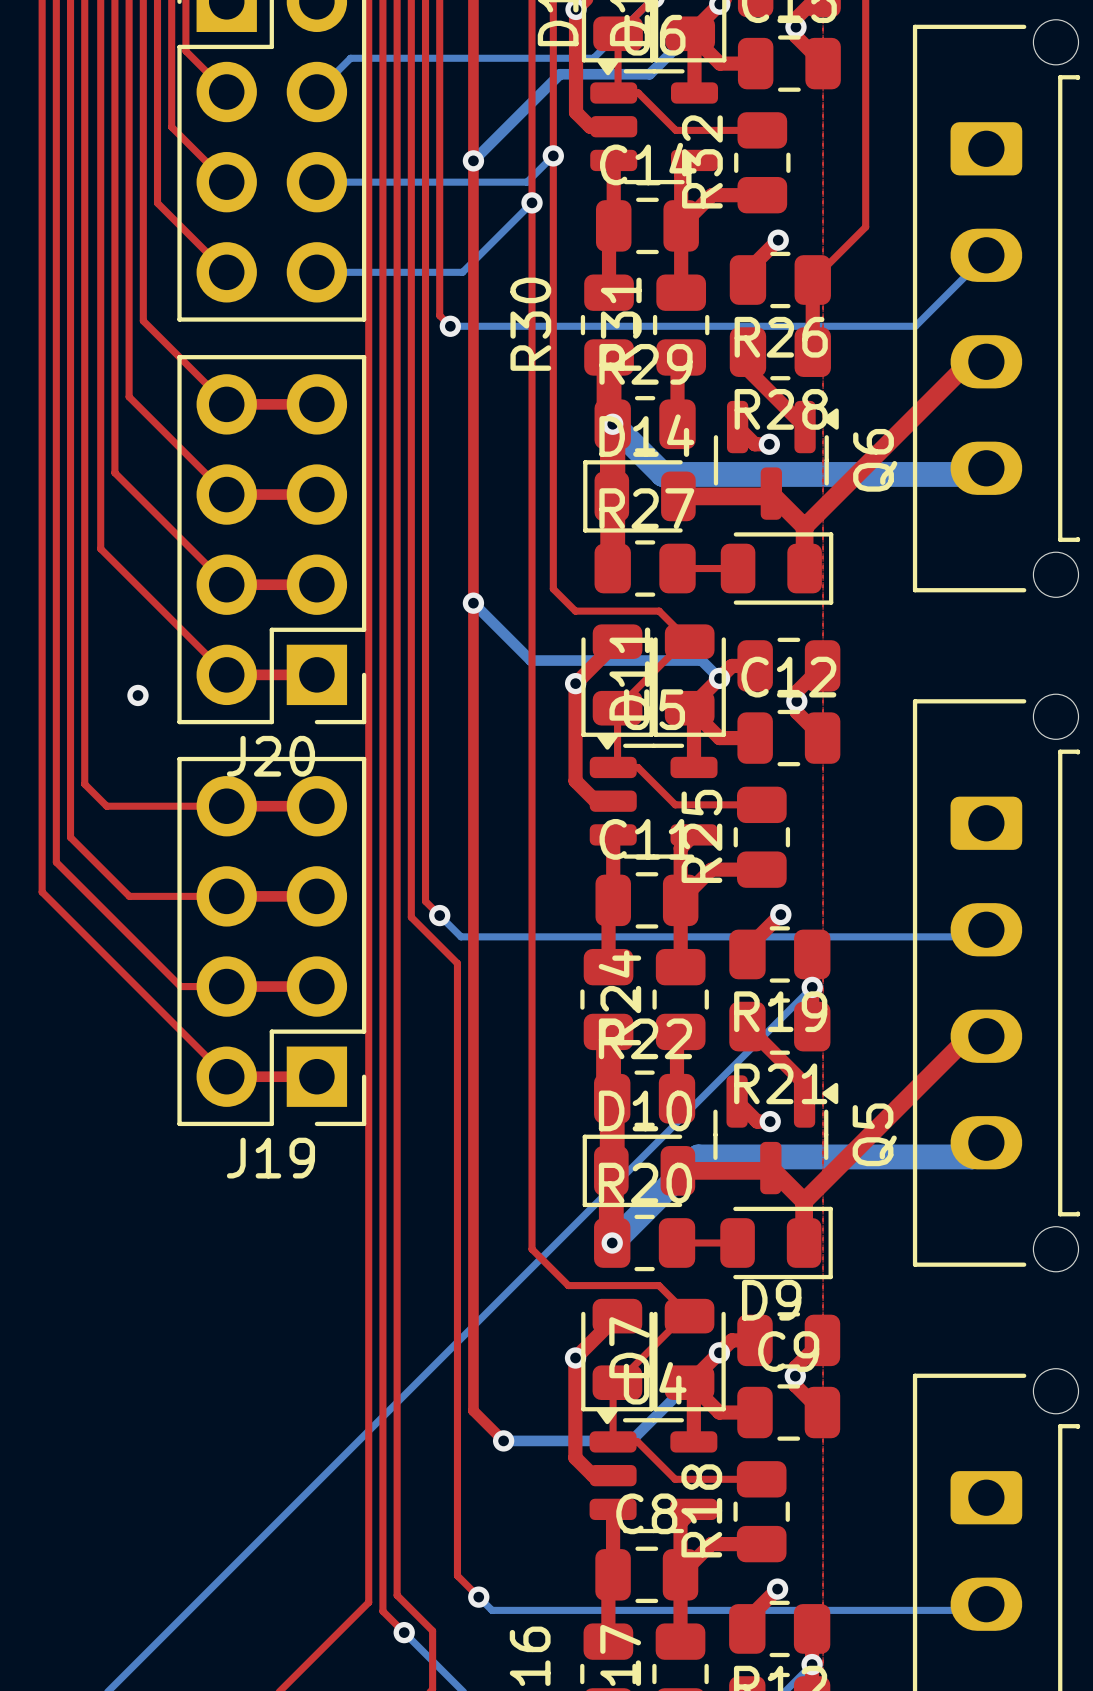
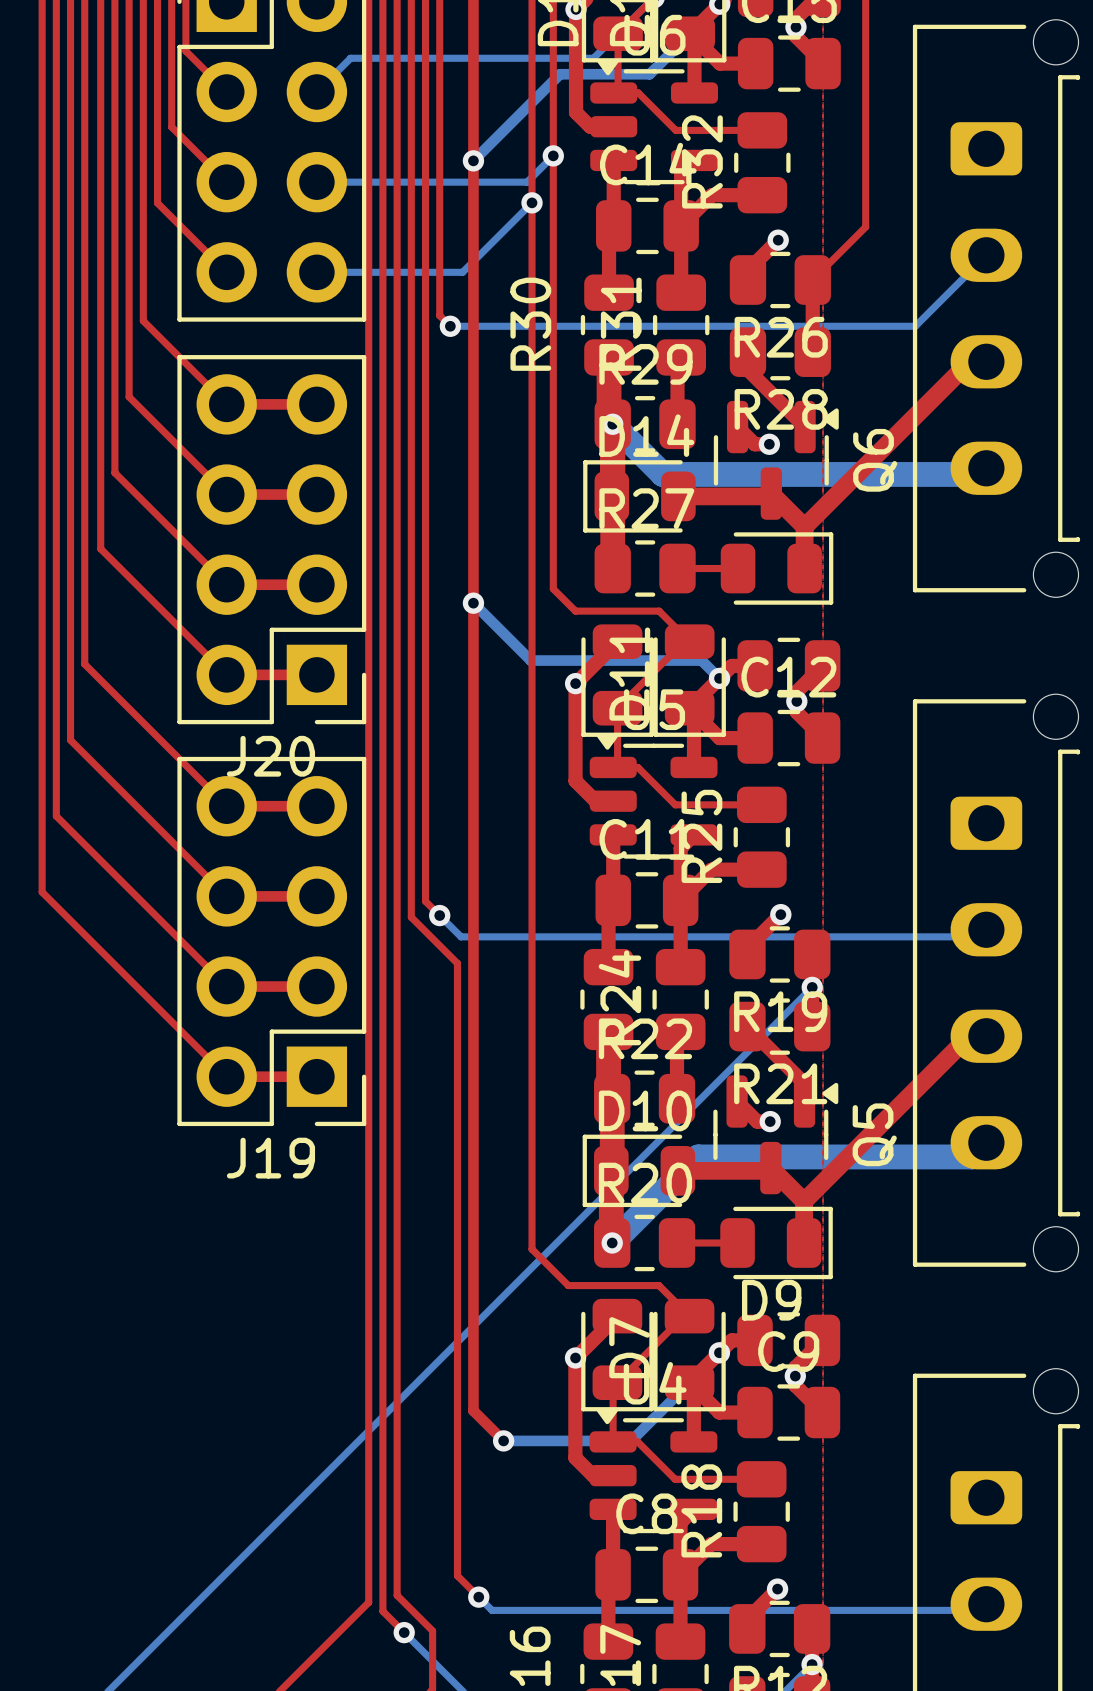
top track: (84, 664) (84, 784) (106, 806) (226, 806) -> (84, 664) (226, 806)
via: (137, 695) -> none
top track: (70, 740) (70, 837) (129, 896) (226, 896) -> (70, 740) (226, 896)
top track: (56, 816) (56, 862) (180, 986) (226, 986) -> (56, 816) (226, 986)

